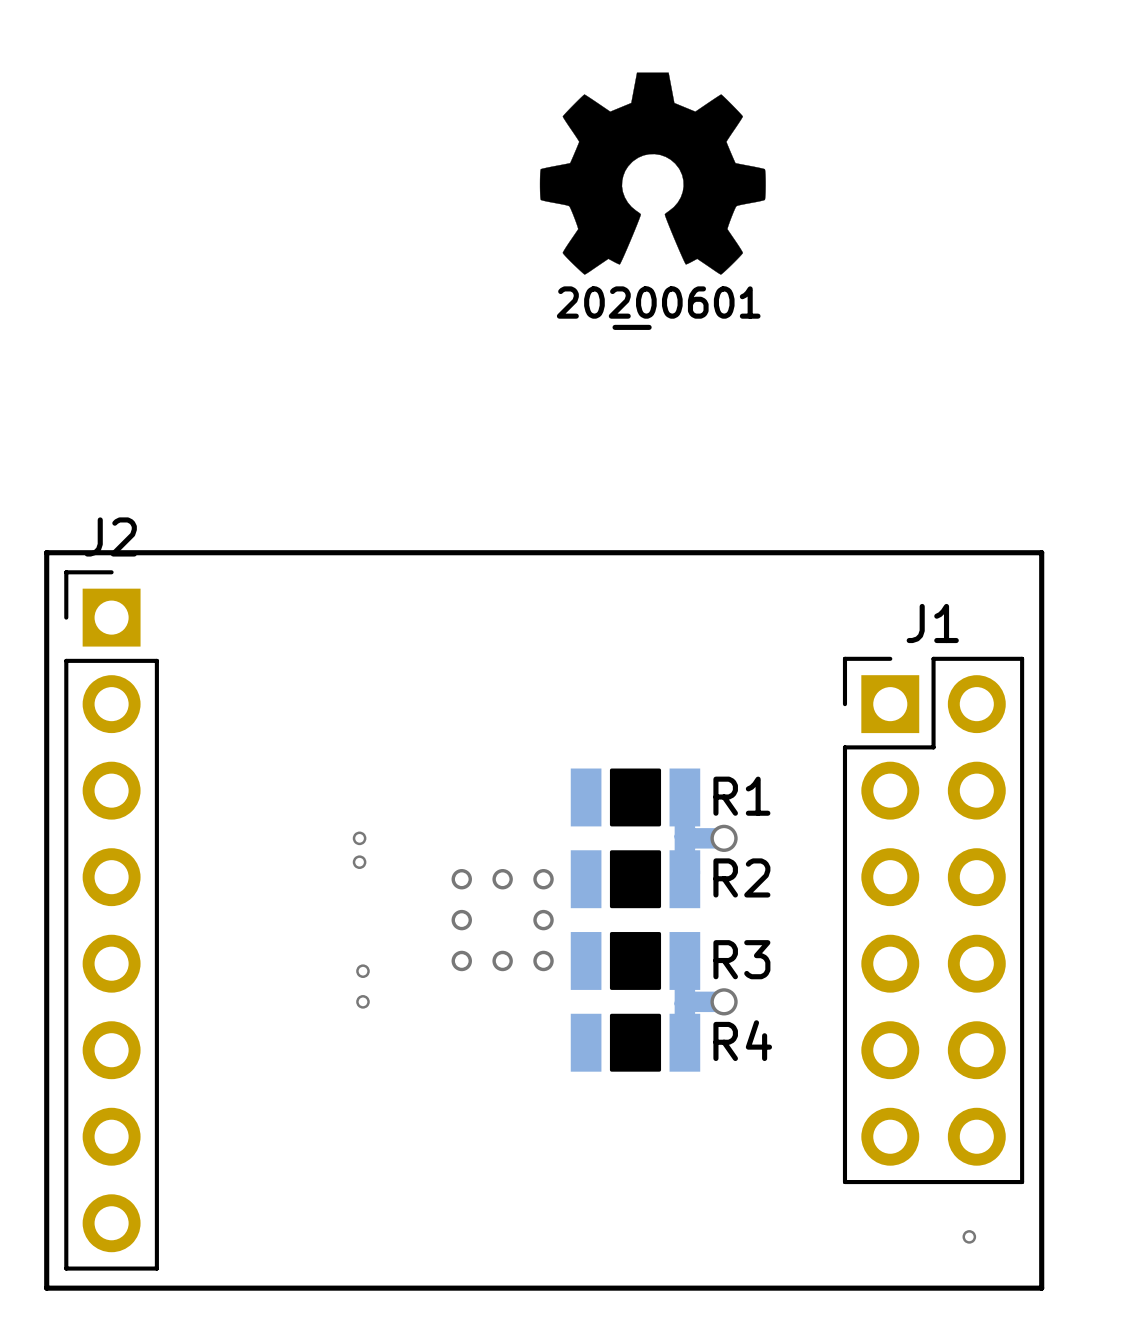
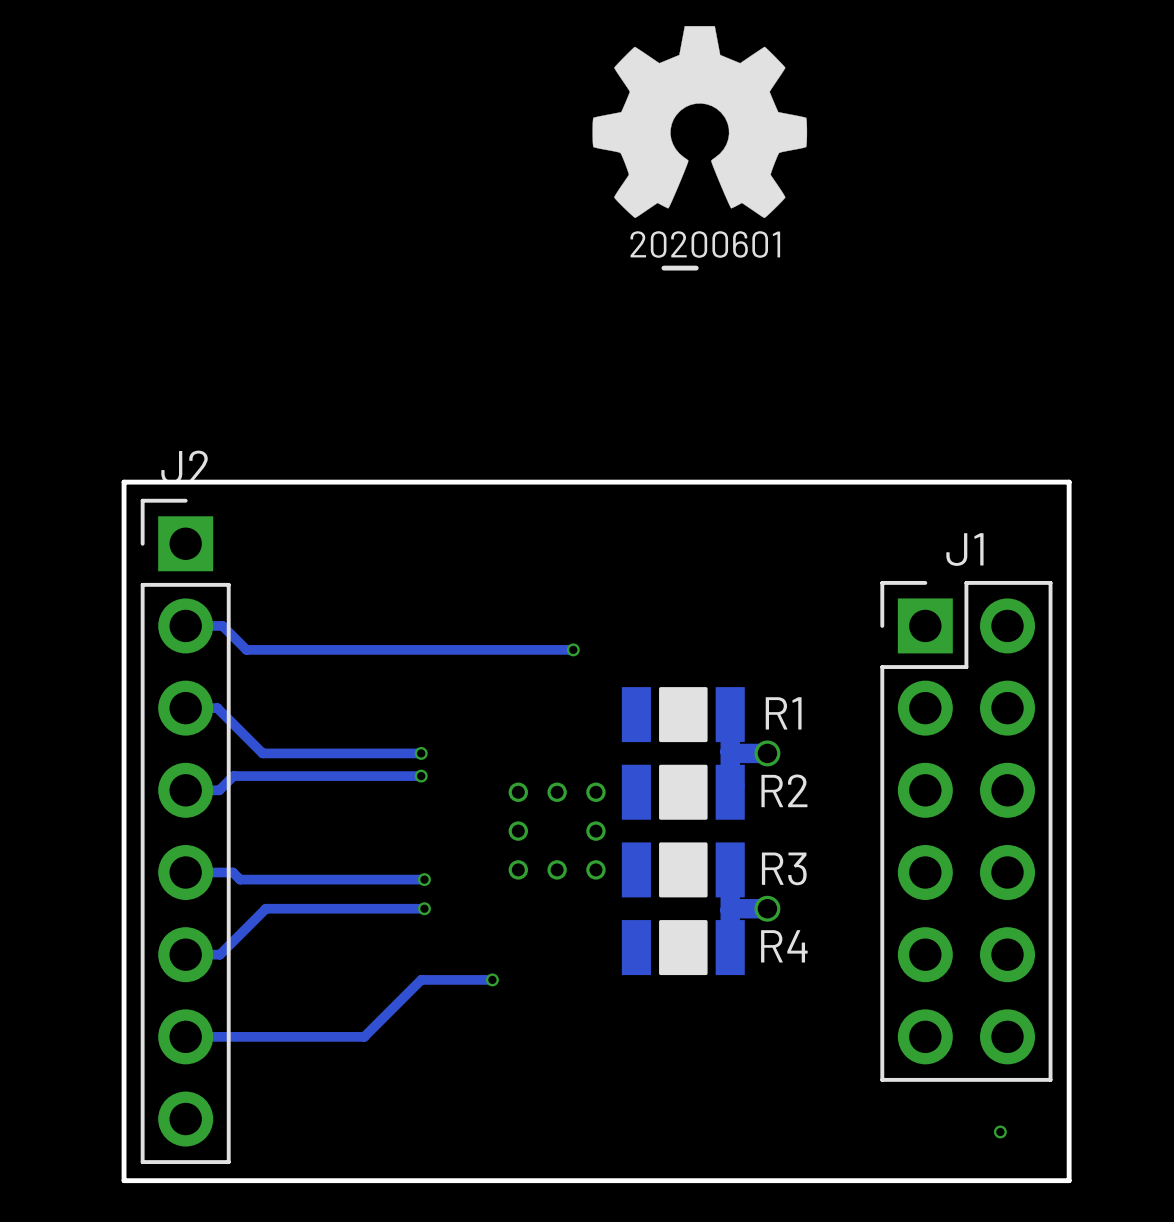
track: none -> (185, 625) (222, 625) (246, 649) (573, 649)
via: none -> (573, 649)
track: none -> (185, 708) (217, 708) (262, 753) (421, 753)
track: none -> (421, 776) (233, 776) (219, 790) (185, 790)
track: none -> (185, 872) (232, 872) (240, 879) (424, 879)
track: none -> (424, 908) (265, 908) (219, 954) (185, 954)
track: none -> (492, 979) (421, 979) (364, 1036) (185, 1036)
via: none -> (492, 979)

